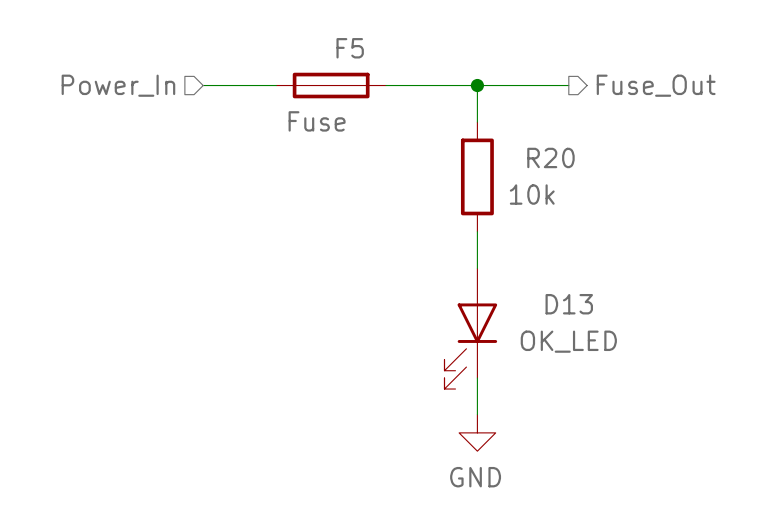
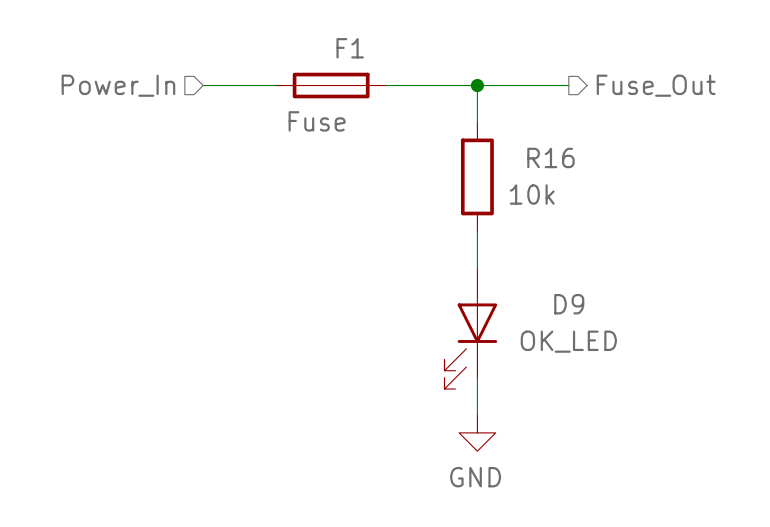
F5 name: F5 (350, 48) -> F1 (350, 48)
R20 name: R20 (550, 157) -> R16 (550, 157)
D13 name: D13 (569, 304) -> D9 (569, 304)

